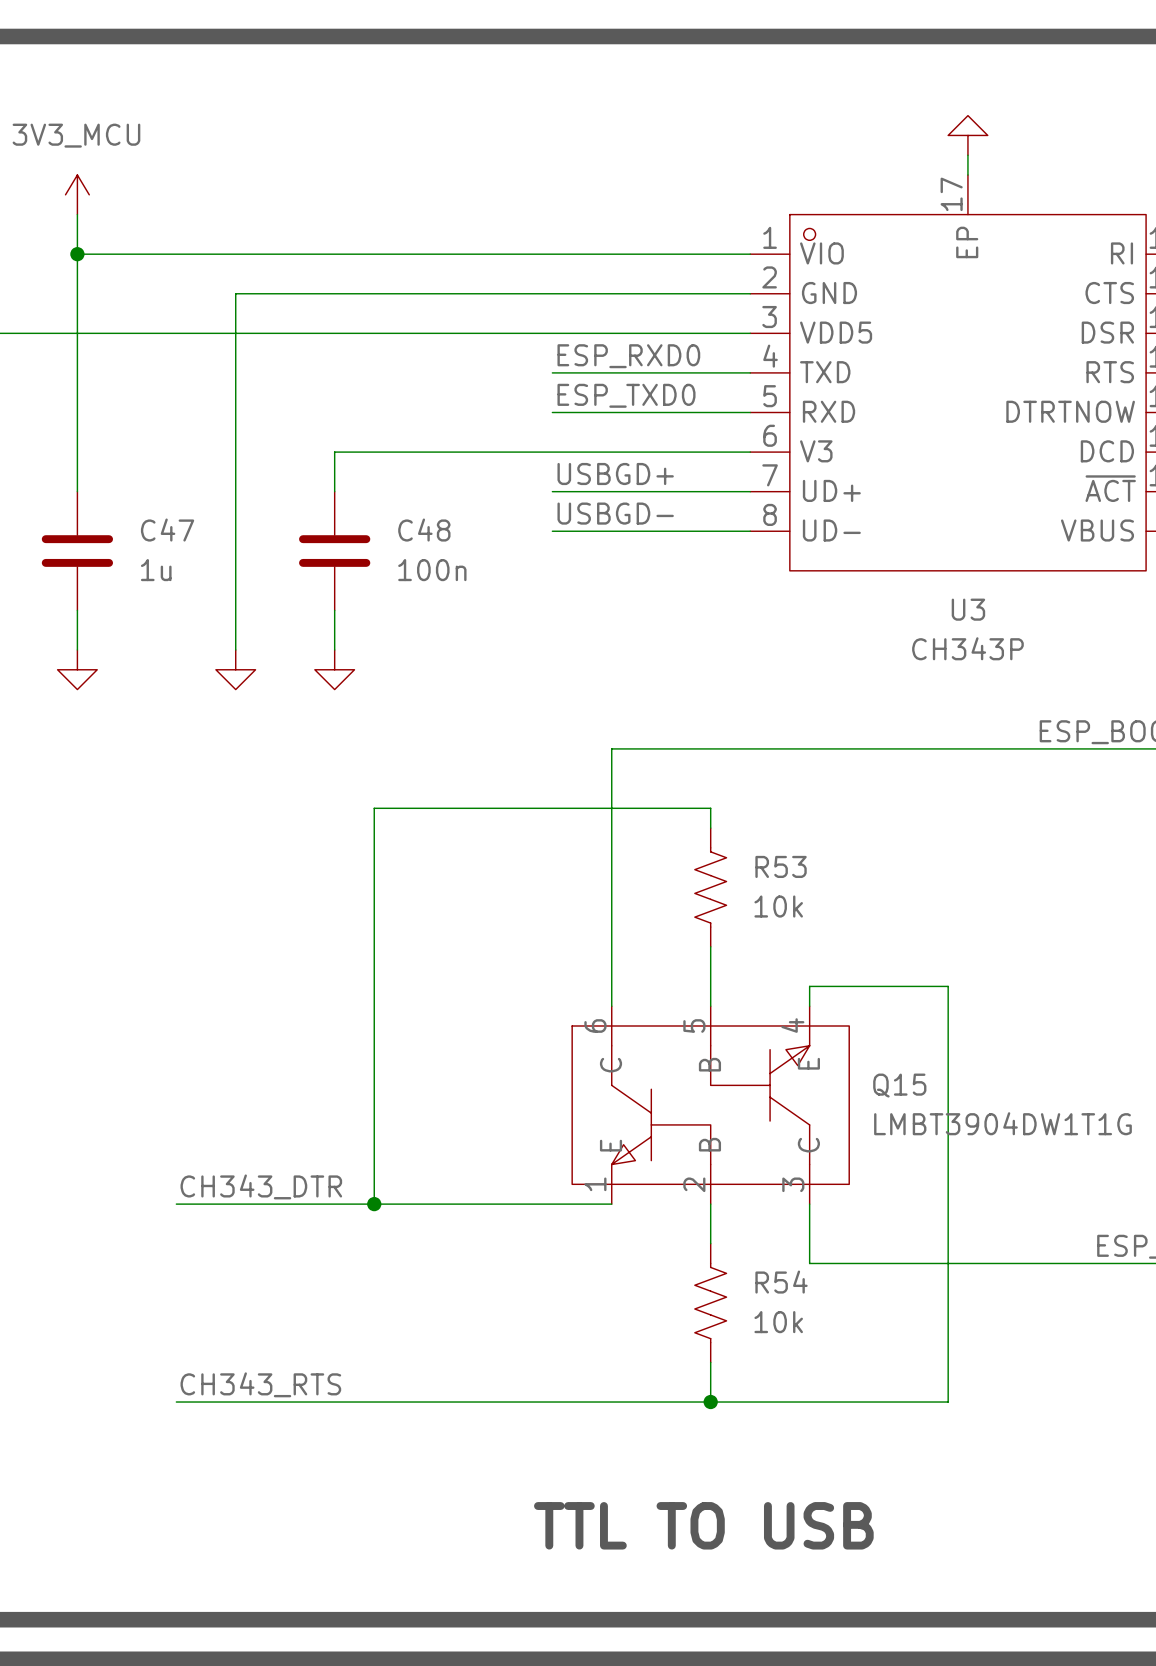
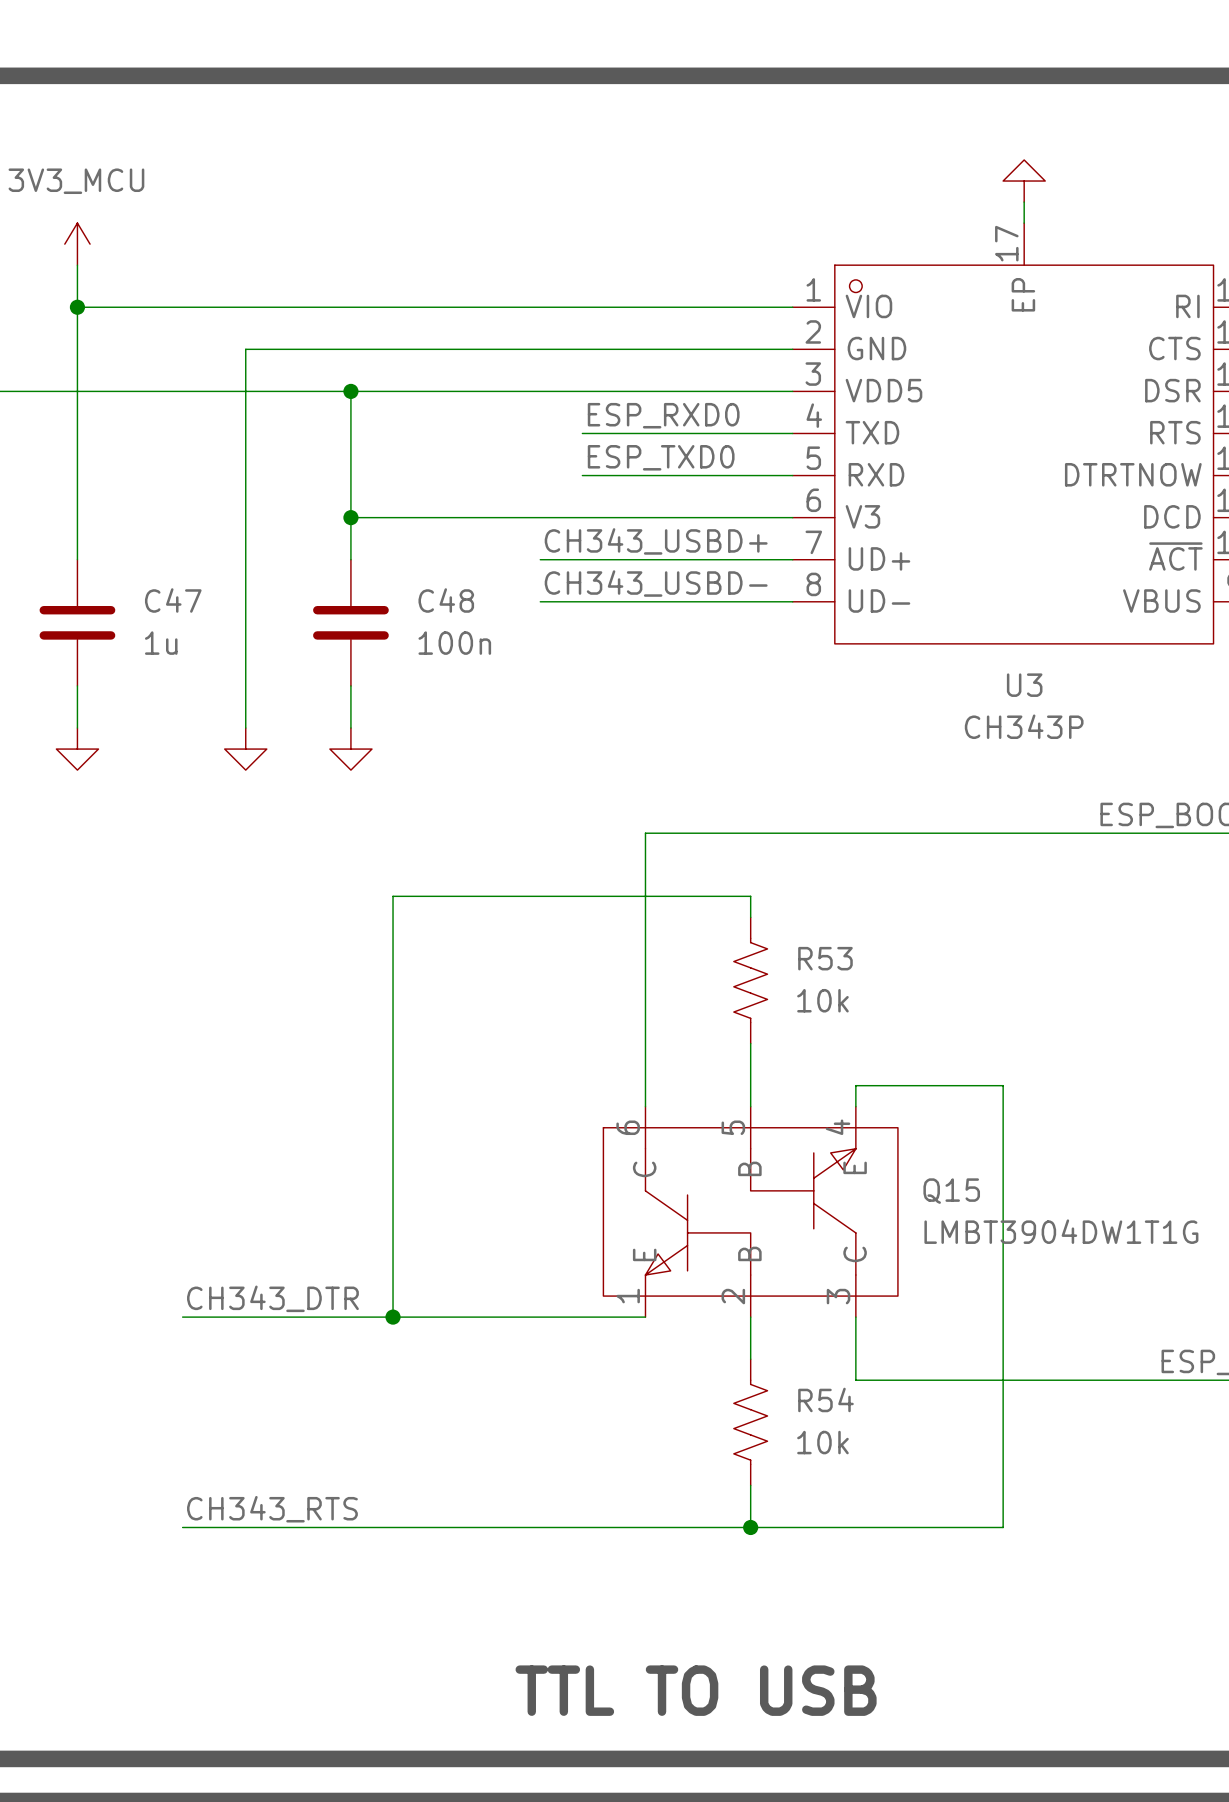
wire: none -> (350, 391) (350, 517)
junction: none -> (350, 391)
junction: none -> (350, 517)
label: USBGD+ (615, 474) -> none
label: none -> CH343_USBD+ (656, 541)
wire: none -> (540, 559) (582, 559)
label: USBGD- (615, 513) -> none
label: none -> CH343_USBD- (656, 583)
wire: none -> (540, 601) (582, 601)
text position: TTL TO USB (703, 1525) -> TTL TO USB (696, 1690)

